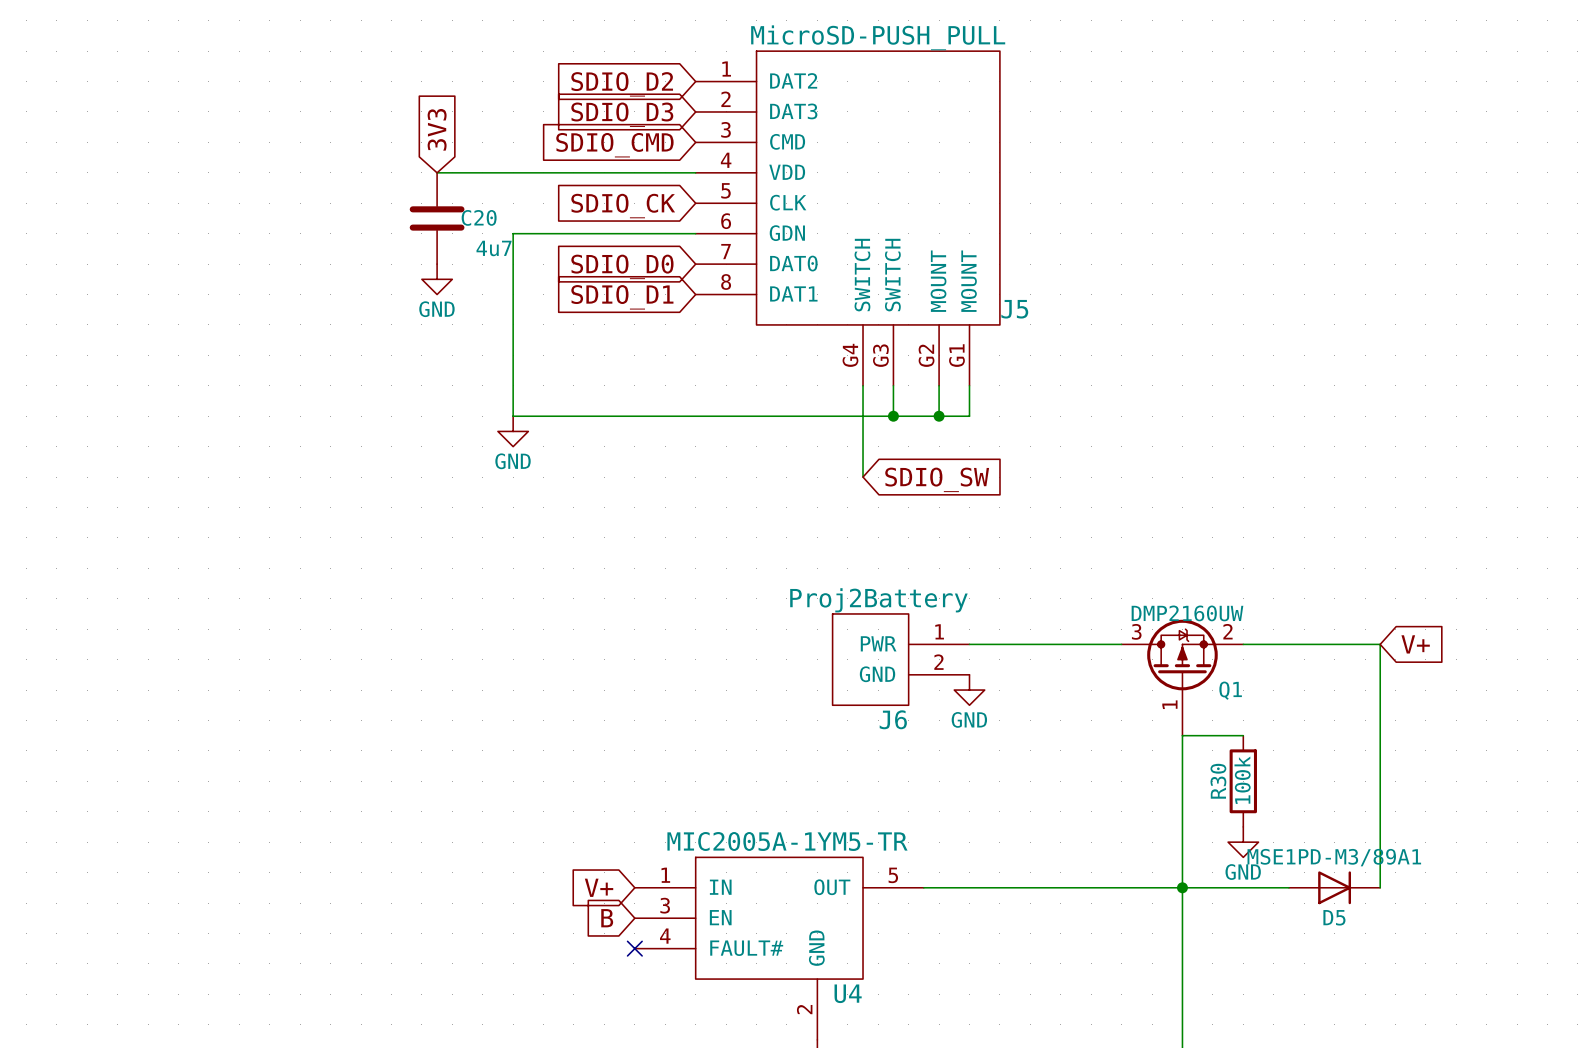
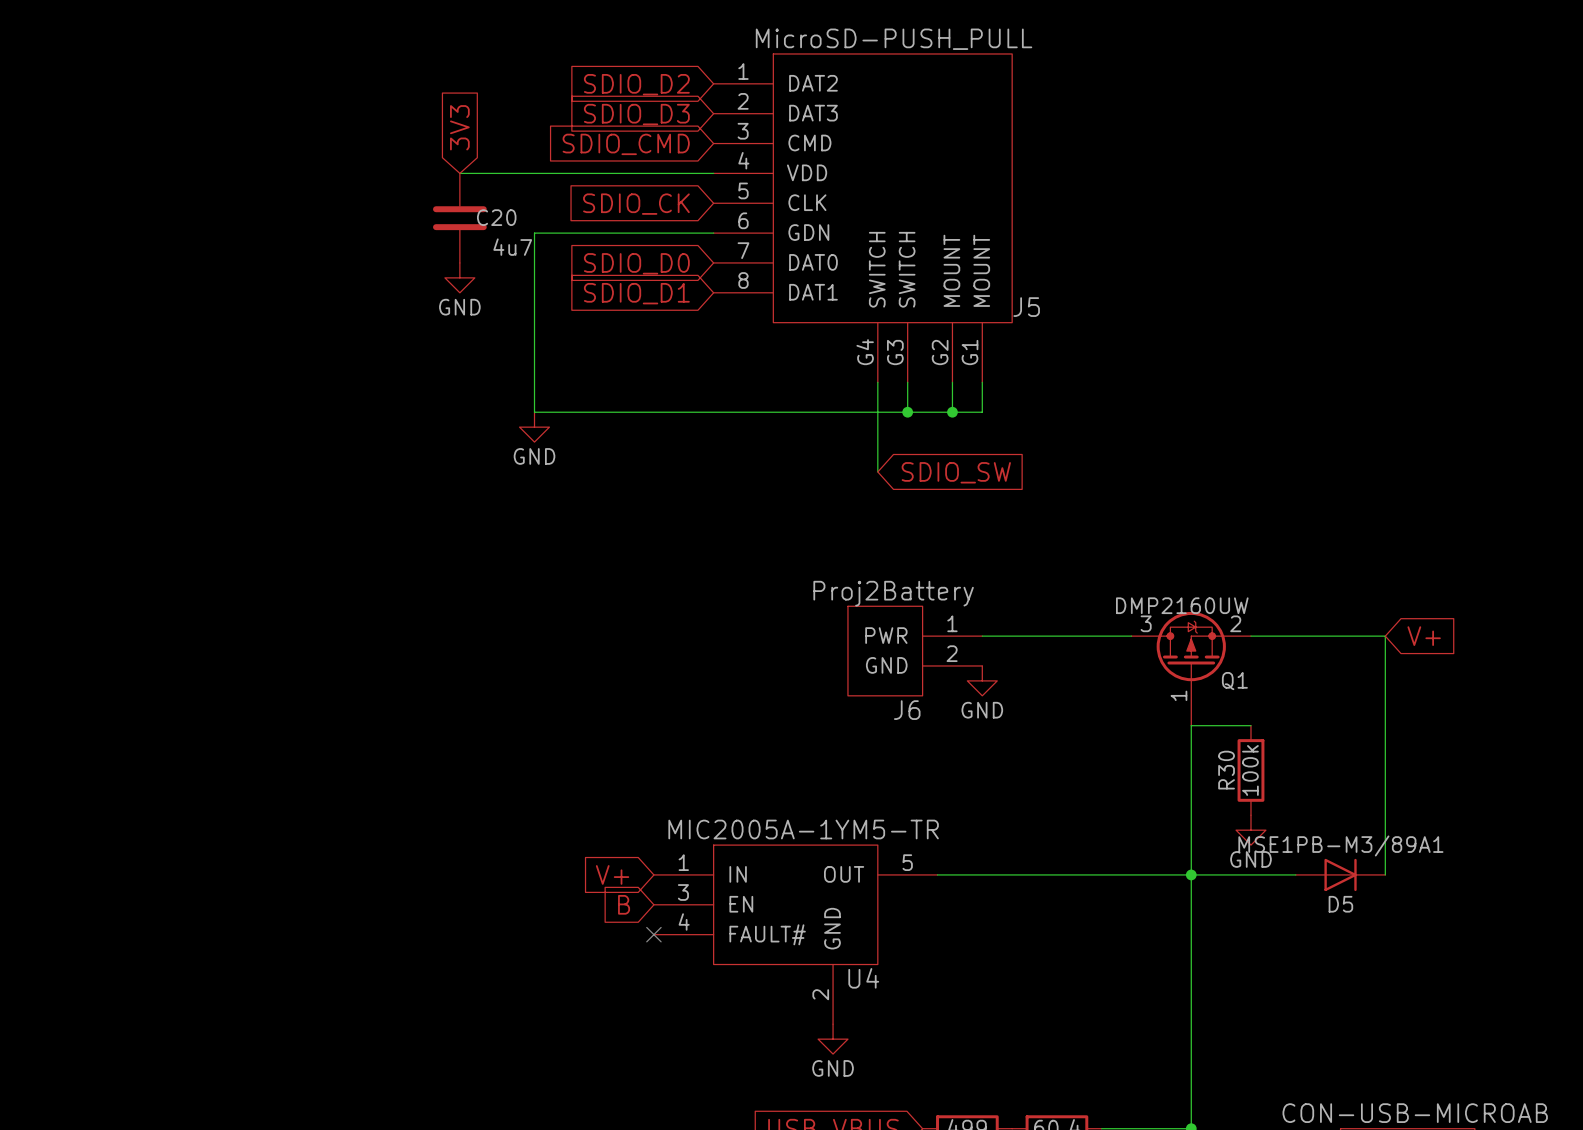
D5 value: MSE1PD-M3/89A1 (1334, 857) -> MSE1PB-M3/89A1 (1340, 845)

